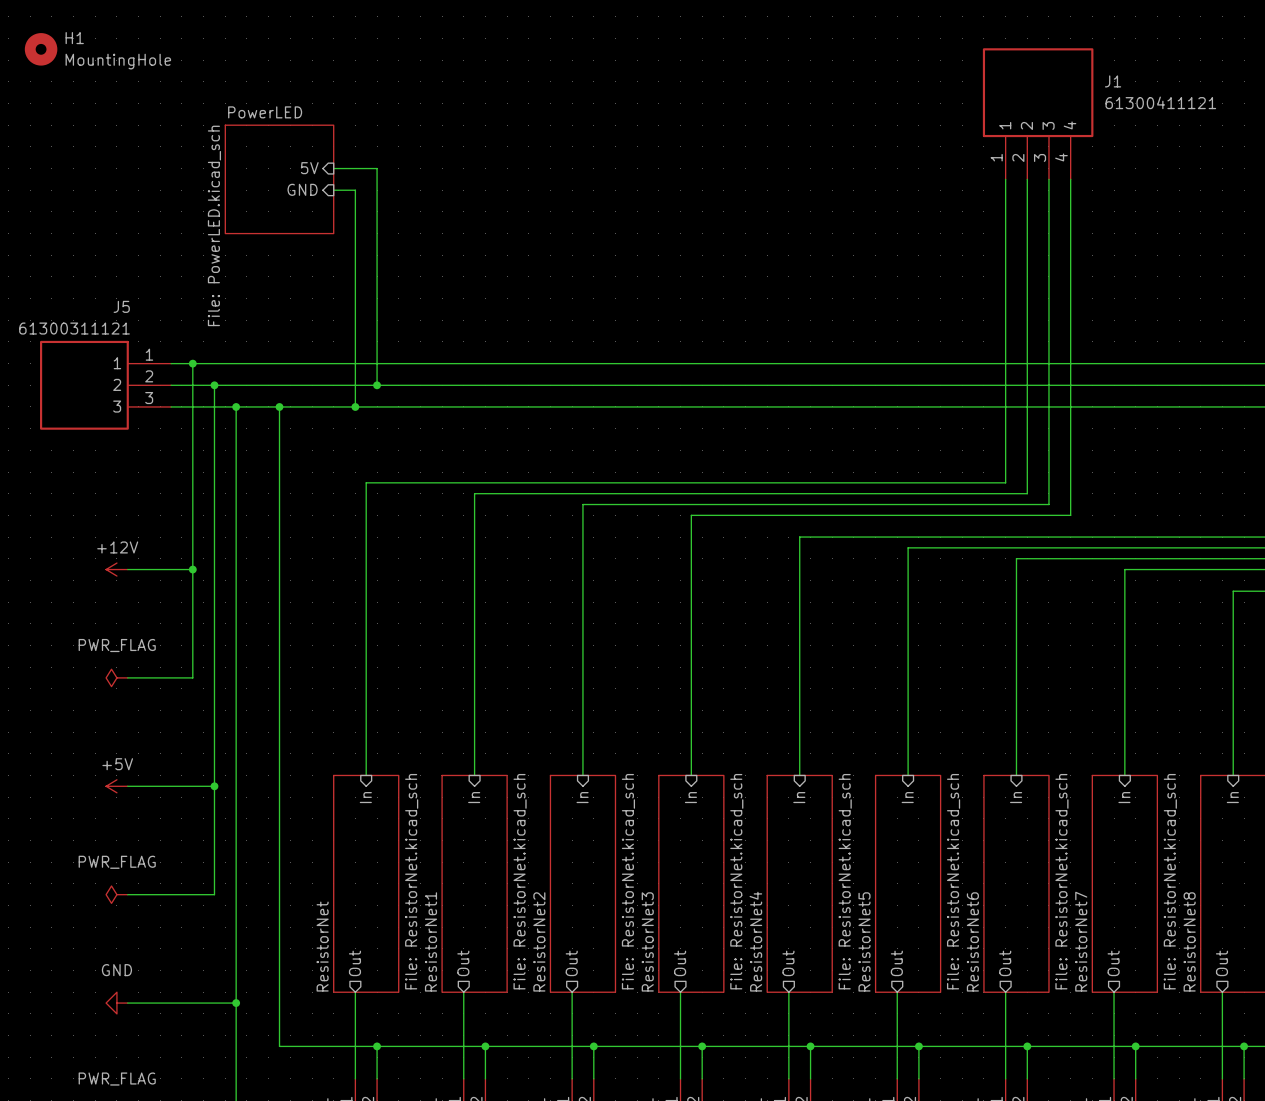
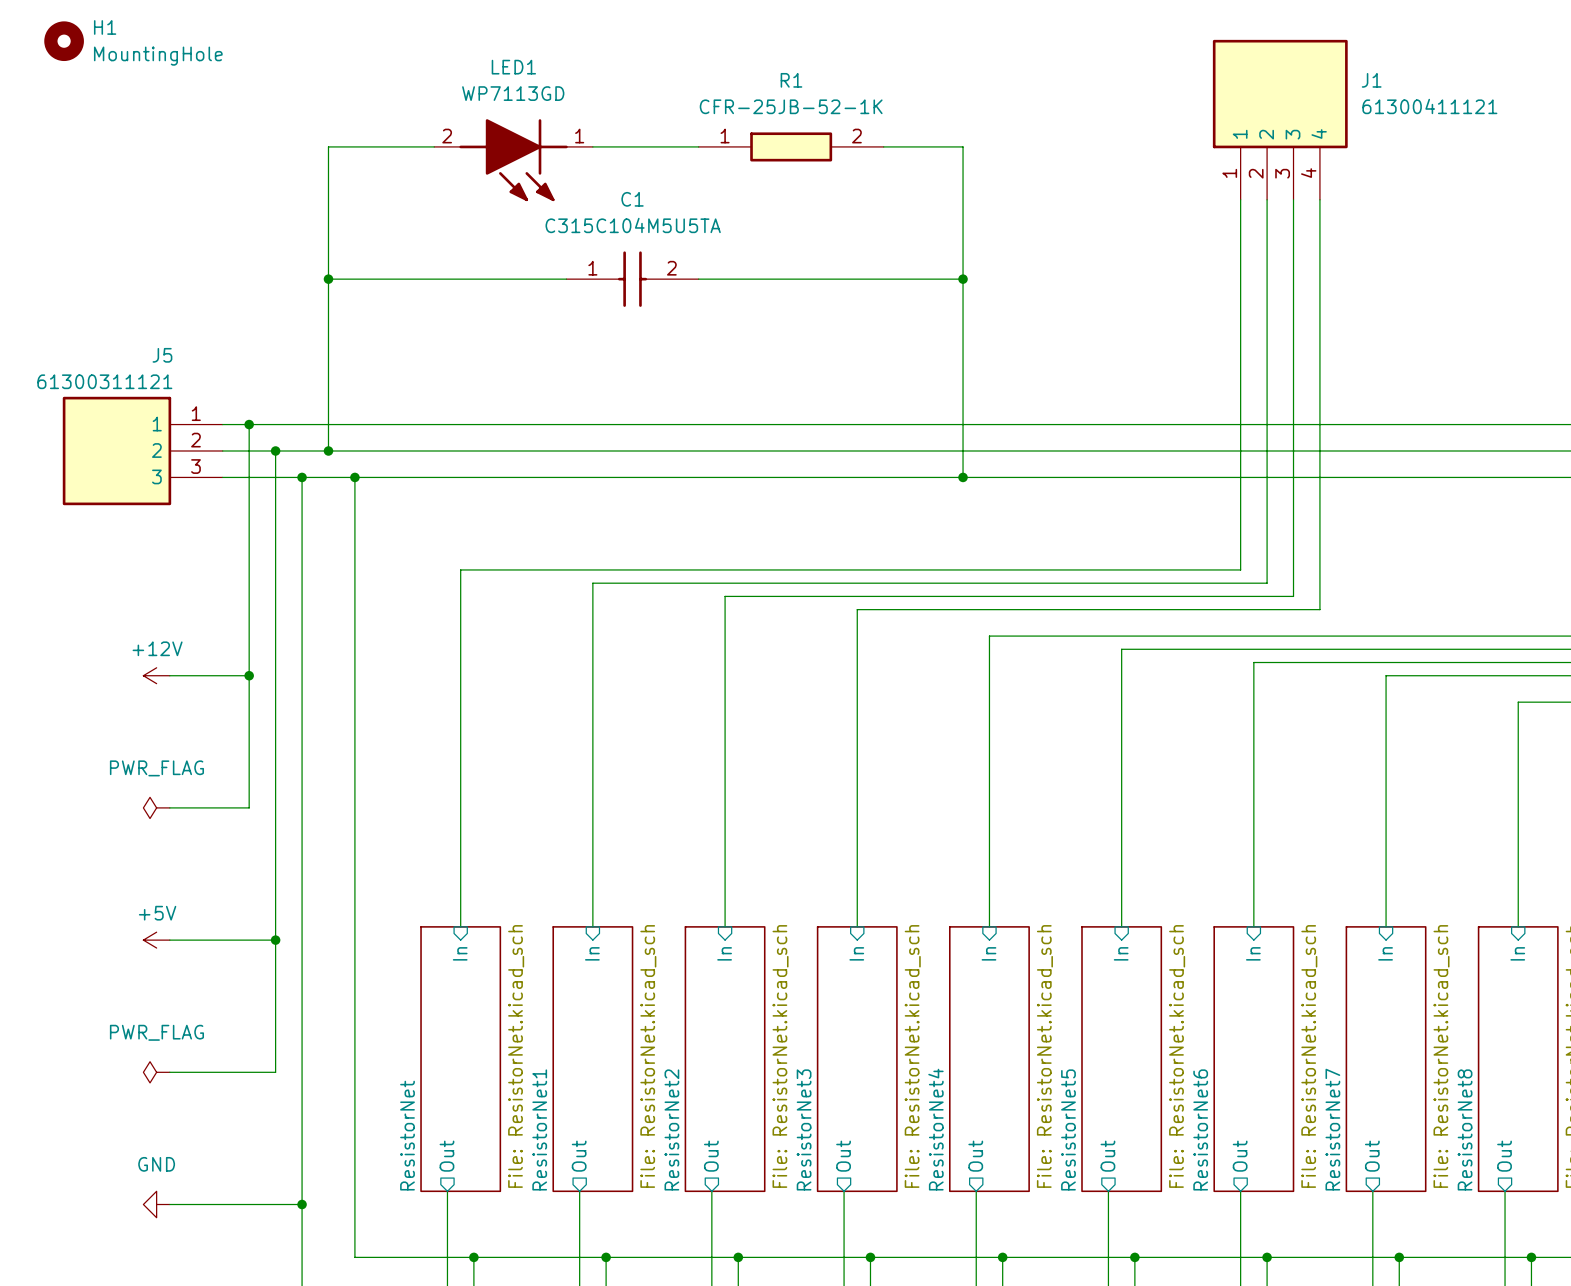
wire: none -> (434, 146) (328, 146) (328, 450)
wire: none -> (592, 146) (698, 146)
R1: none -> CFR-25JB-52-1K (791, 146)
wire: none -> (883, 146) (963, 146) (963, 477)
LED1: none -> WP7113GD (513, 160)
sheet pin: 5V (309, 168) -> none
wire: (333, 168) (377, 168) (377, 385) -> none
sheet PowerLED: File: PowerLED.kicad_sch (279, 179) -> none
sheet pin: GND (302, 189) -> none
wire: (333, 190) (355, 190) (355, 406) -> none
wire: none -> (328, 279) (566, 279)
junction: none -> (328, 279)
C1: none -> C315C104M5U5TA (632, 279)
wire: none -> (698, 279) (963, 279)
junction: none -> (963, 279)
junction: none -> (328, 450)
junction: (377, 385) -> none
junction: (355, 406) -> none
junction: none -> (963, 477)

